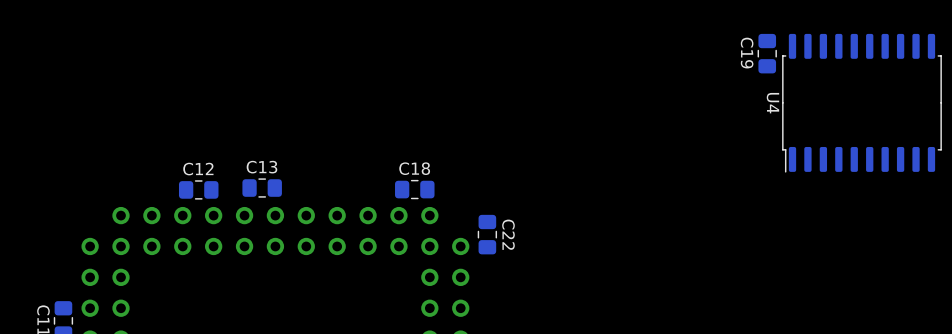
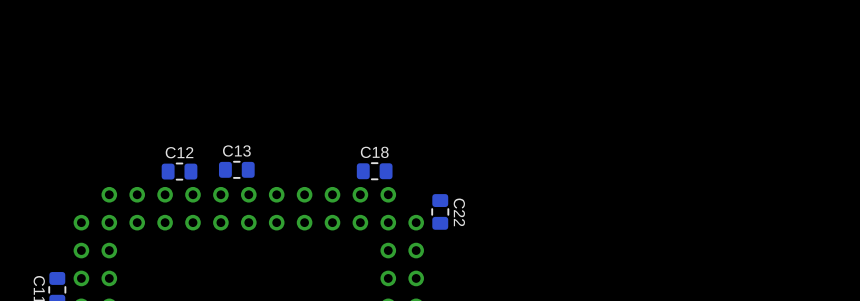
C19: (767, 53) -> none
U4: (861, 103) -> none

